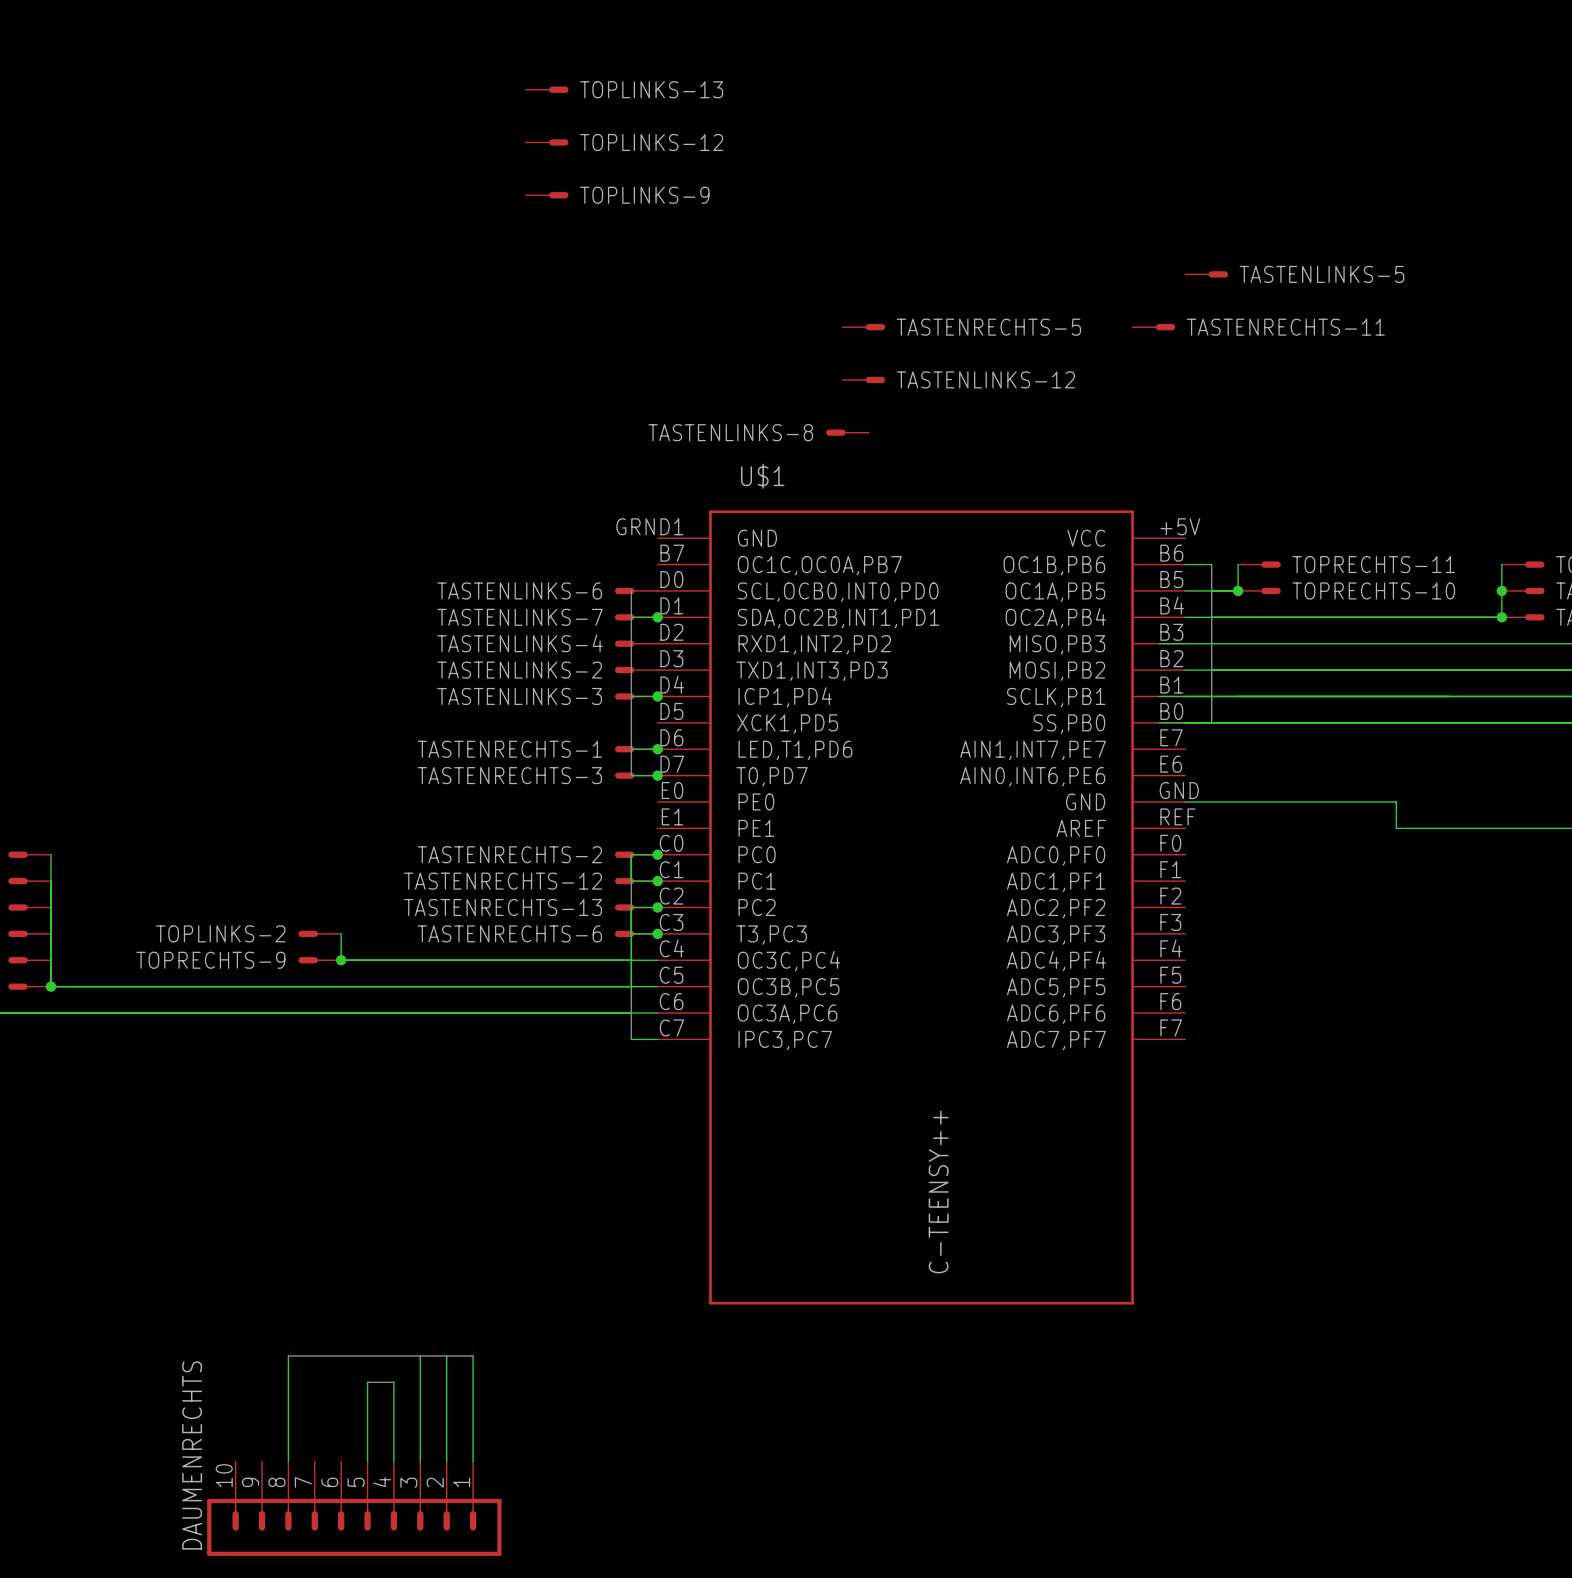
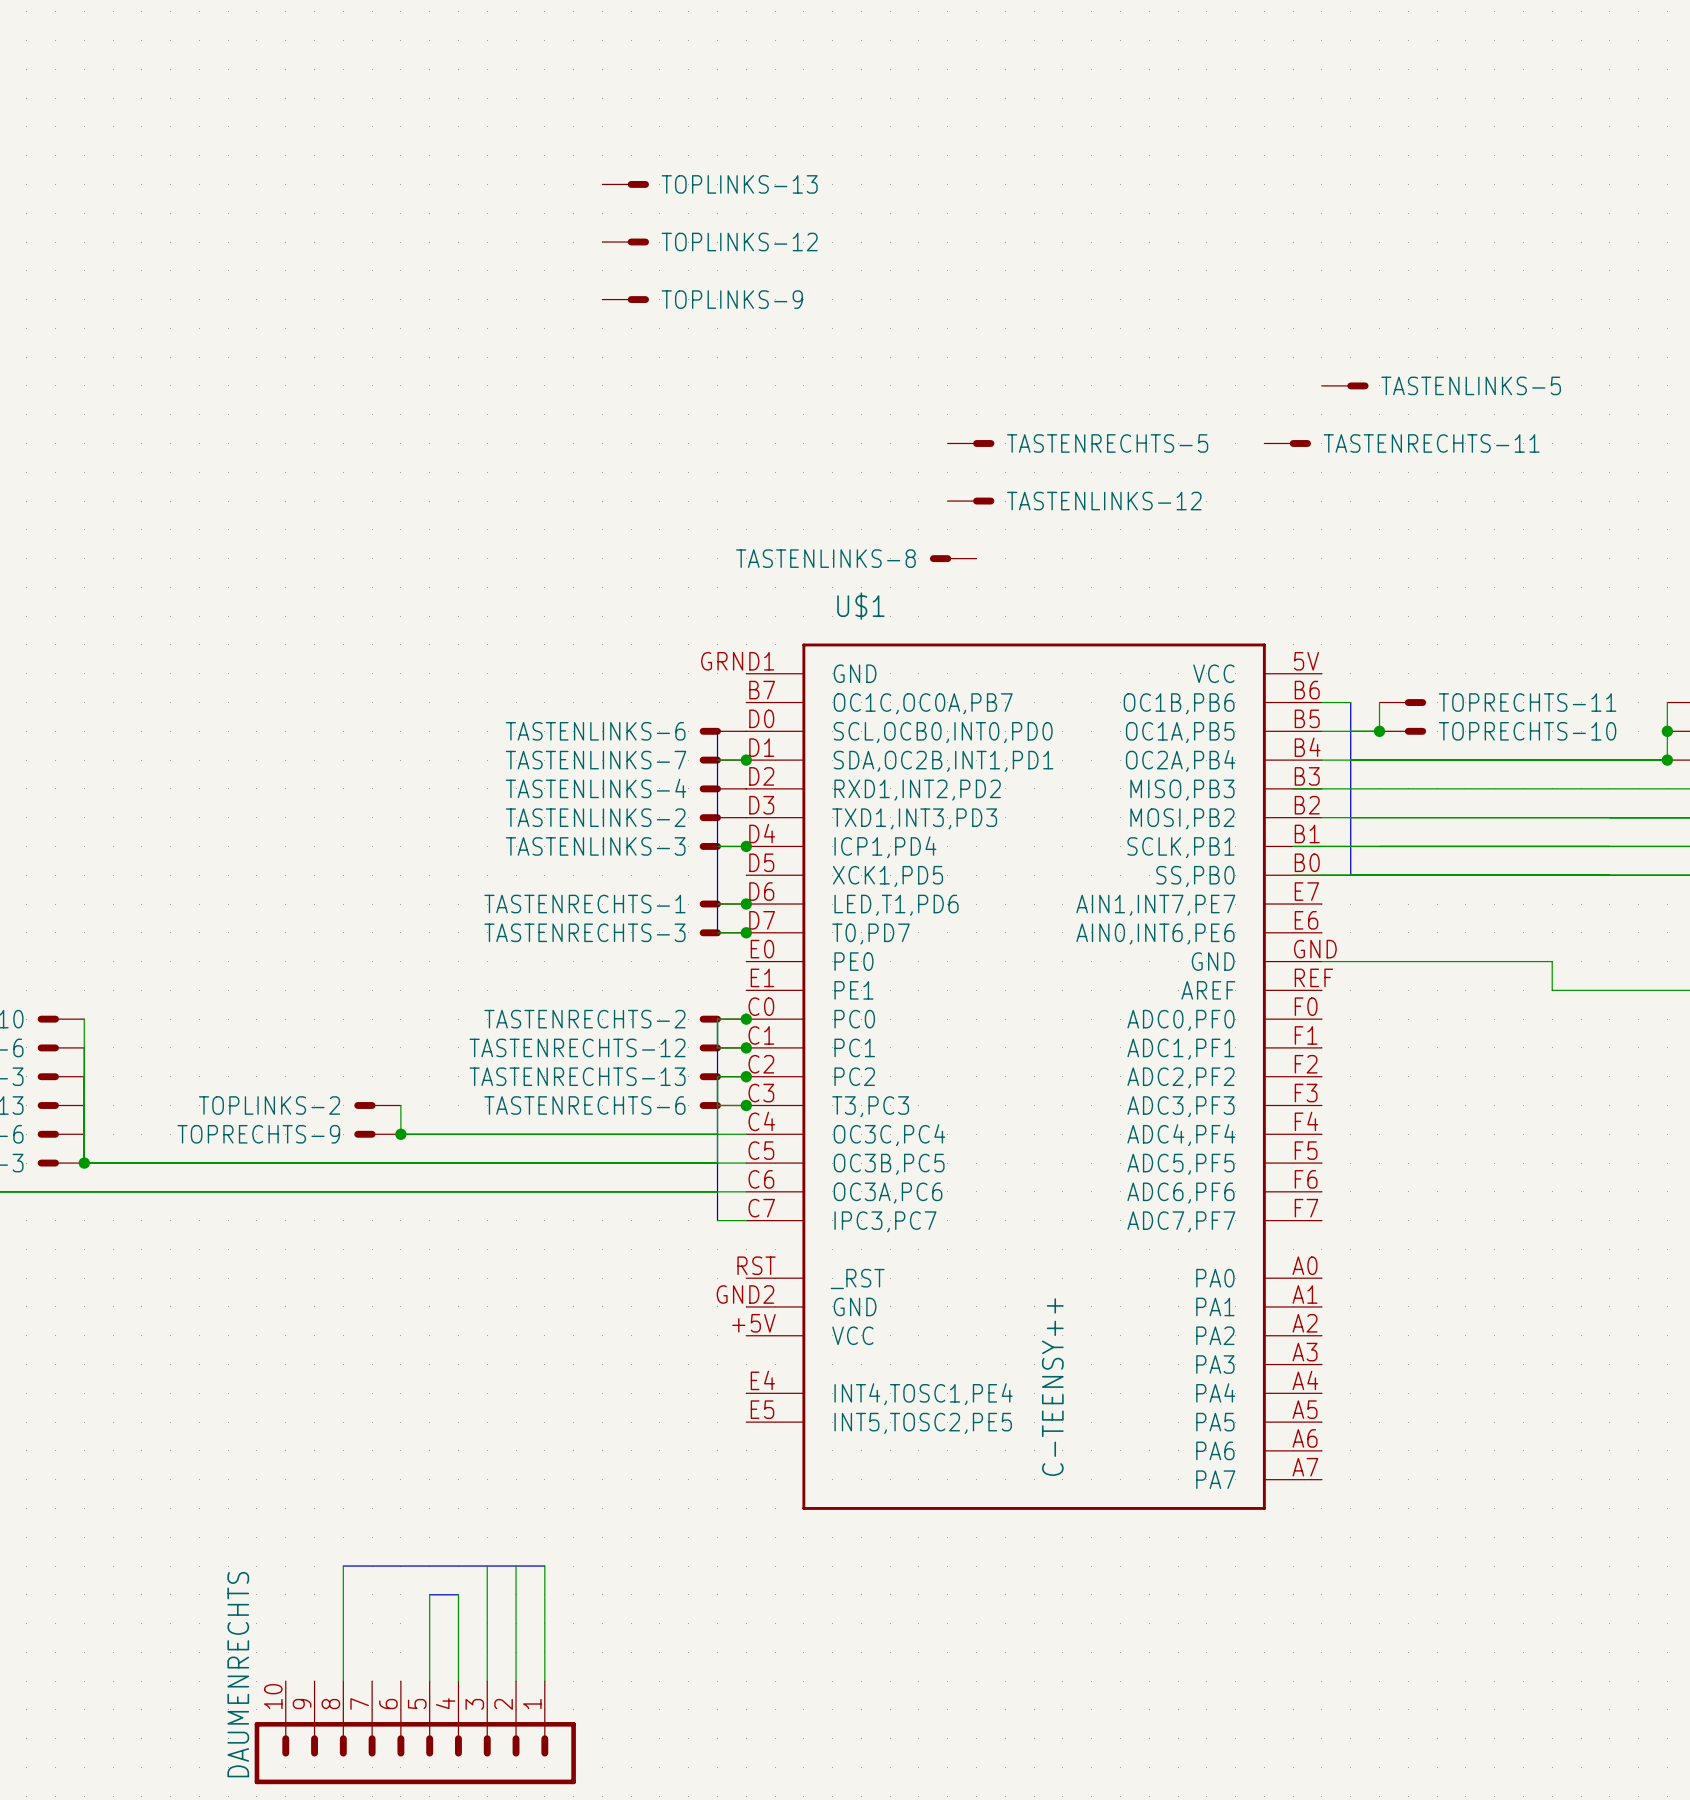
U$1 symbol: [657, 510, 1186, 1305] -> [746, 643, 1322, 1510]

